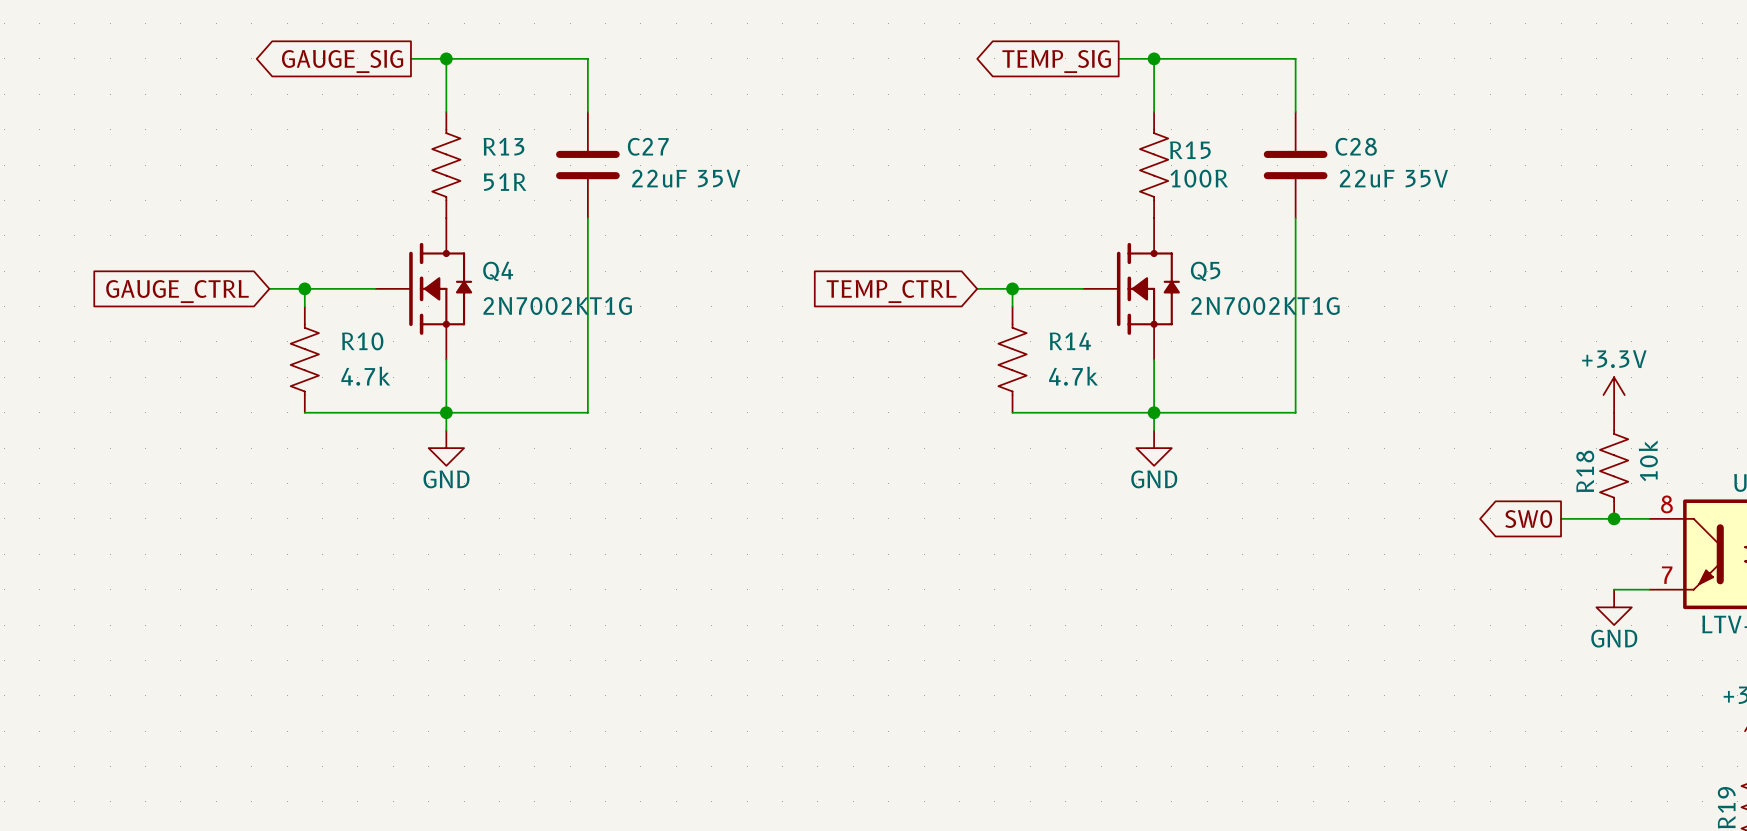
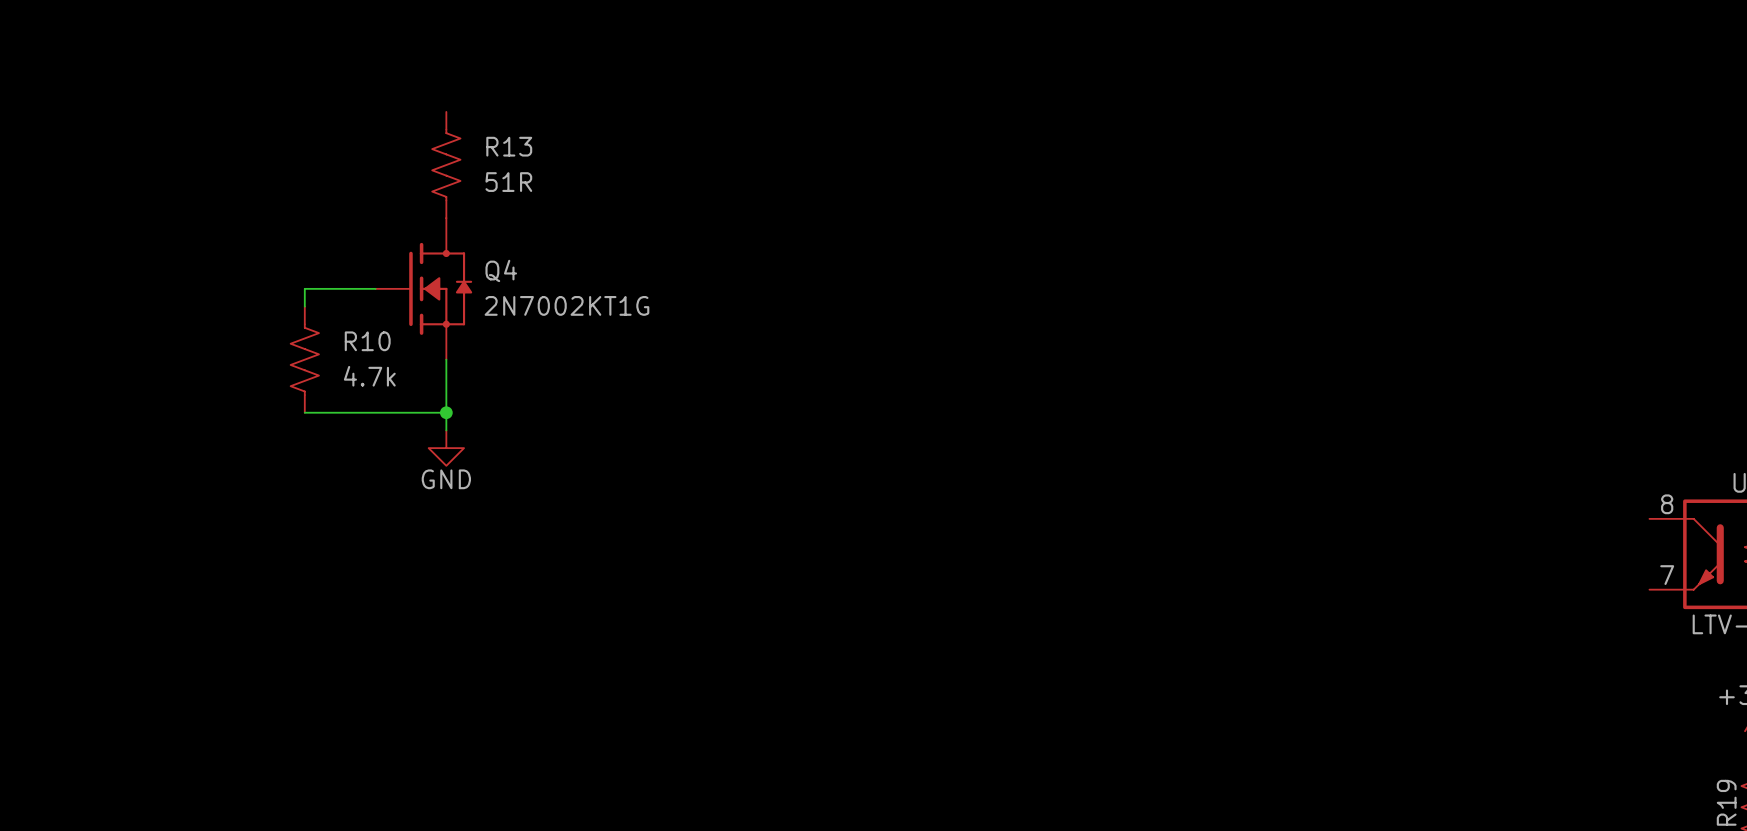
wire: (410, 58) (587, 58) (587, 111) -> none
wire: (446, 58) (446, 111) -> none
junction: (446, 58) -> none
wire: (1118, 58) (1295, 58) (1295, 111) -> none
wire: (1154, 58) (1154, 111) -> none
junction: (1154, 58) -> none
global label: GAUGE_SIG (342, 61) -> none
global label: TEMP_SIG (1056, 61) -> none
C27: 22uF 35V (587, 165) -> none
R15: 100R (1154, 165) -> none
C28: 22uF 35V (1295, 165) -> none
wire: (587, 218) (587, 412) (446, 412) -> none
wire: (1295, 218) (1295, 412) (1012, 412) -> none
wire: (269, 288) (304, 288) -> none
junction: (304, 288) -> none
wire: (977, 288) (1083, 288) -> none
wire: (1012, 288) (1012, 306) -> none
junction: (1012, 288) -> none
Q5: 2N7002KT1G (1131, 288) -> none
global label: GAUGE_CTRL (177, 291) -> none
global label: TEMP_CTRL (891, 291) -> none
R14: 4.7k (1012, 359) -> none
wire: (1154, 359) (1154, 430) -> none
power symbol: +3.3V (1614, 395) -> none
junction: (1154, 412) -> none
power symbol: GND (1154, 448) -> none
R18: 10k (1614, 465) -> none
global label: SW0 (1528, 518) -> none
wire: (1561, 518) (1649, 518) -> none
junction: (1614, 518) -> none
wire: (1614, 589) (1649, 589) -> none
power symbol: GND (1614, 607) -> none

